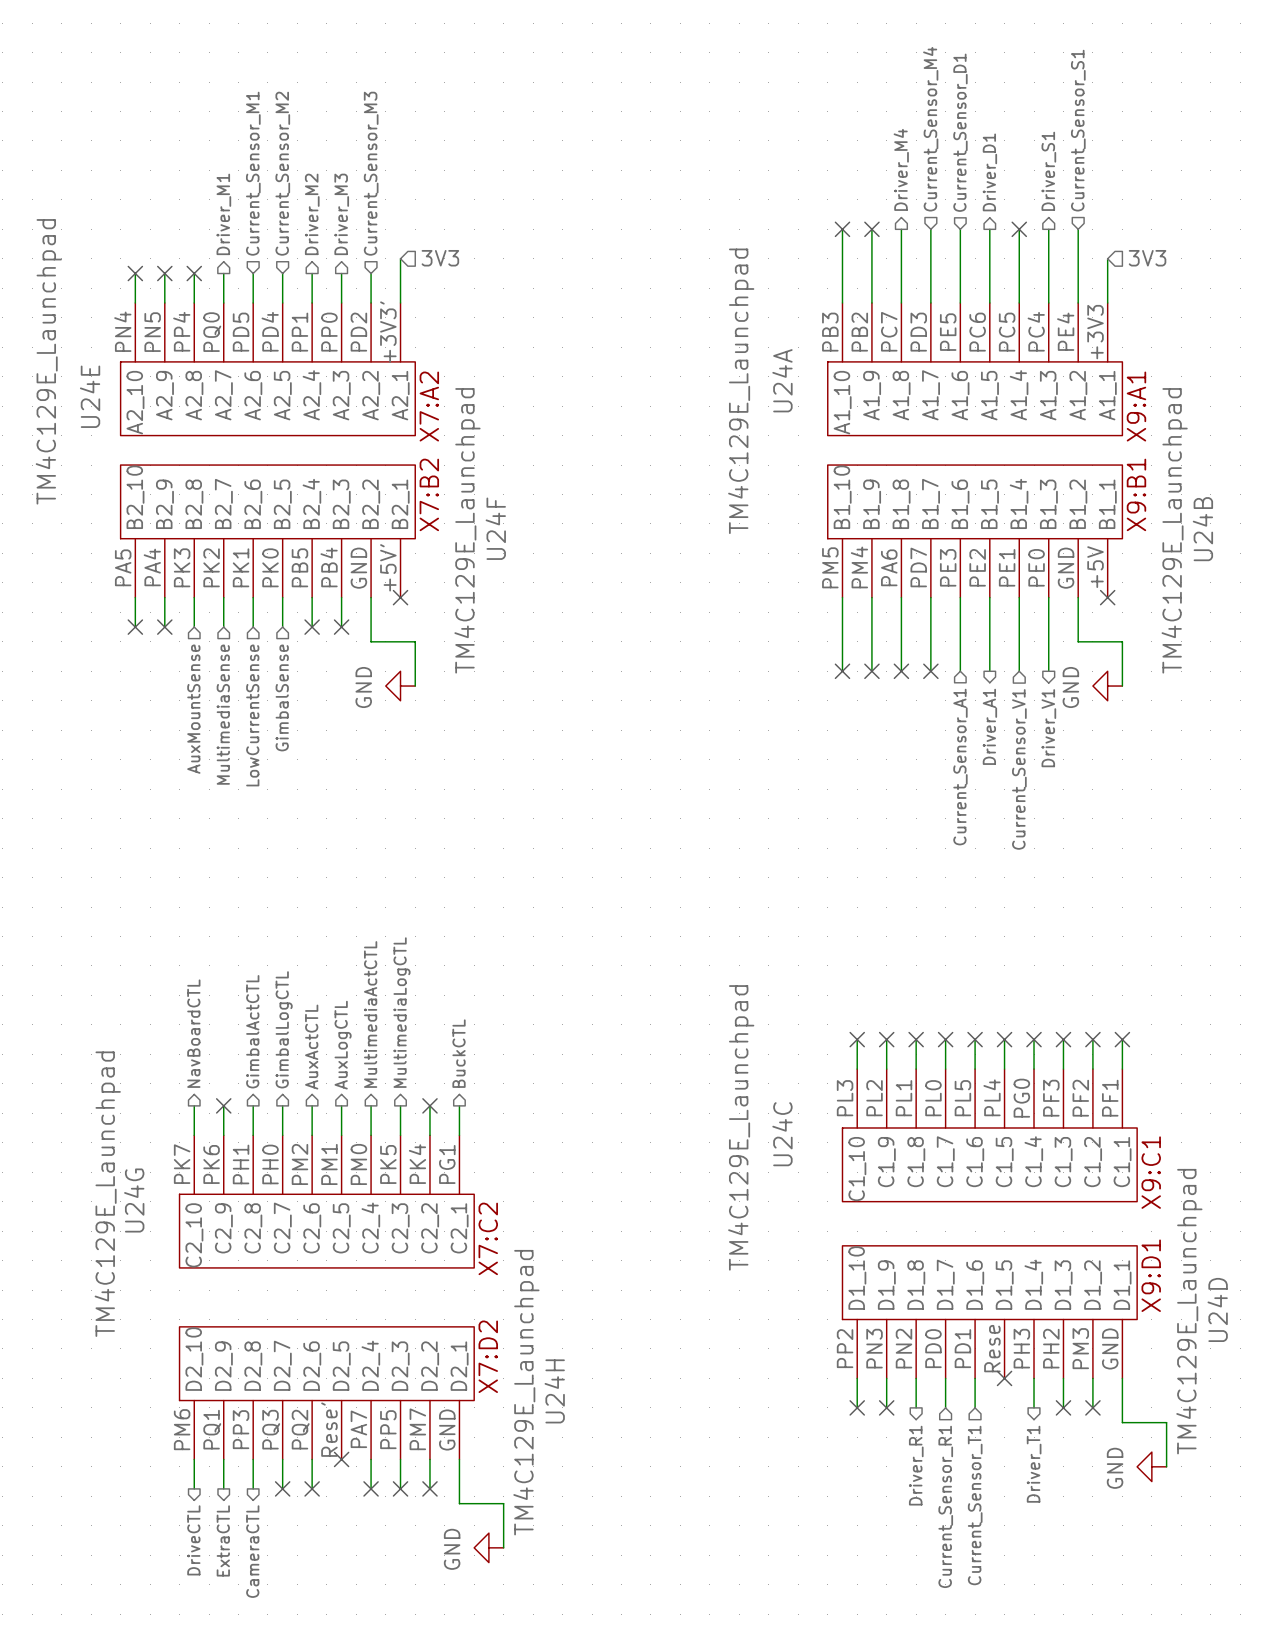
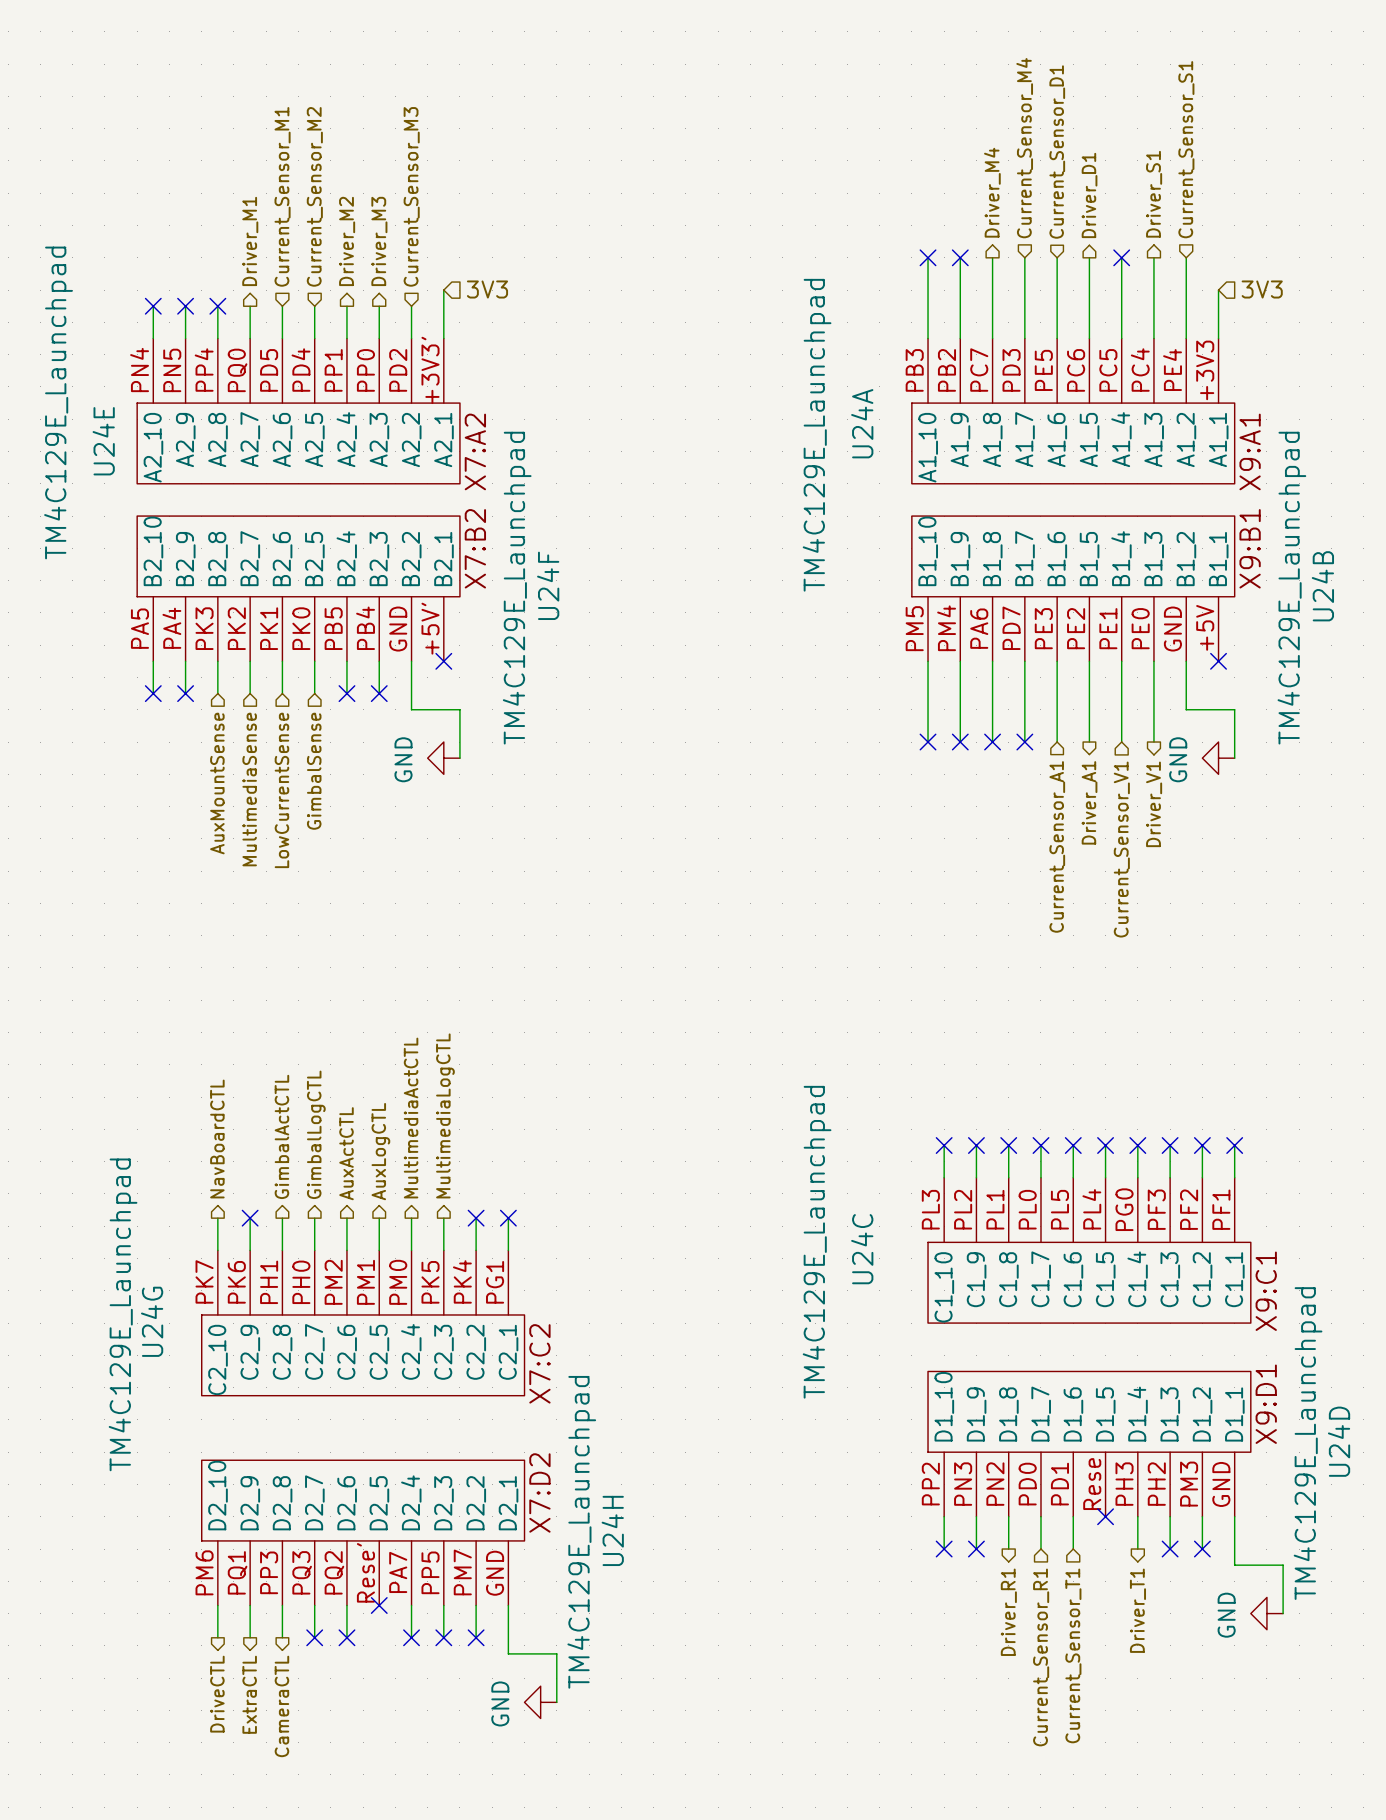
hierarchical label: BuckCTL (459, 1053) -> none
no-connect mark: none -> (508, 1218)

